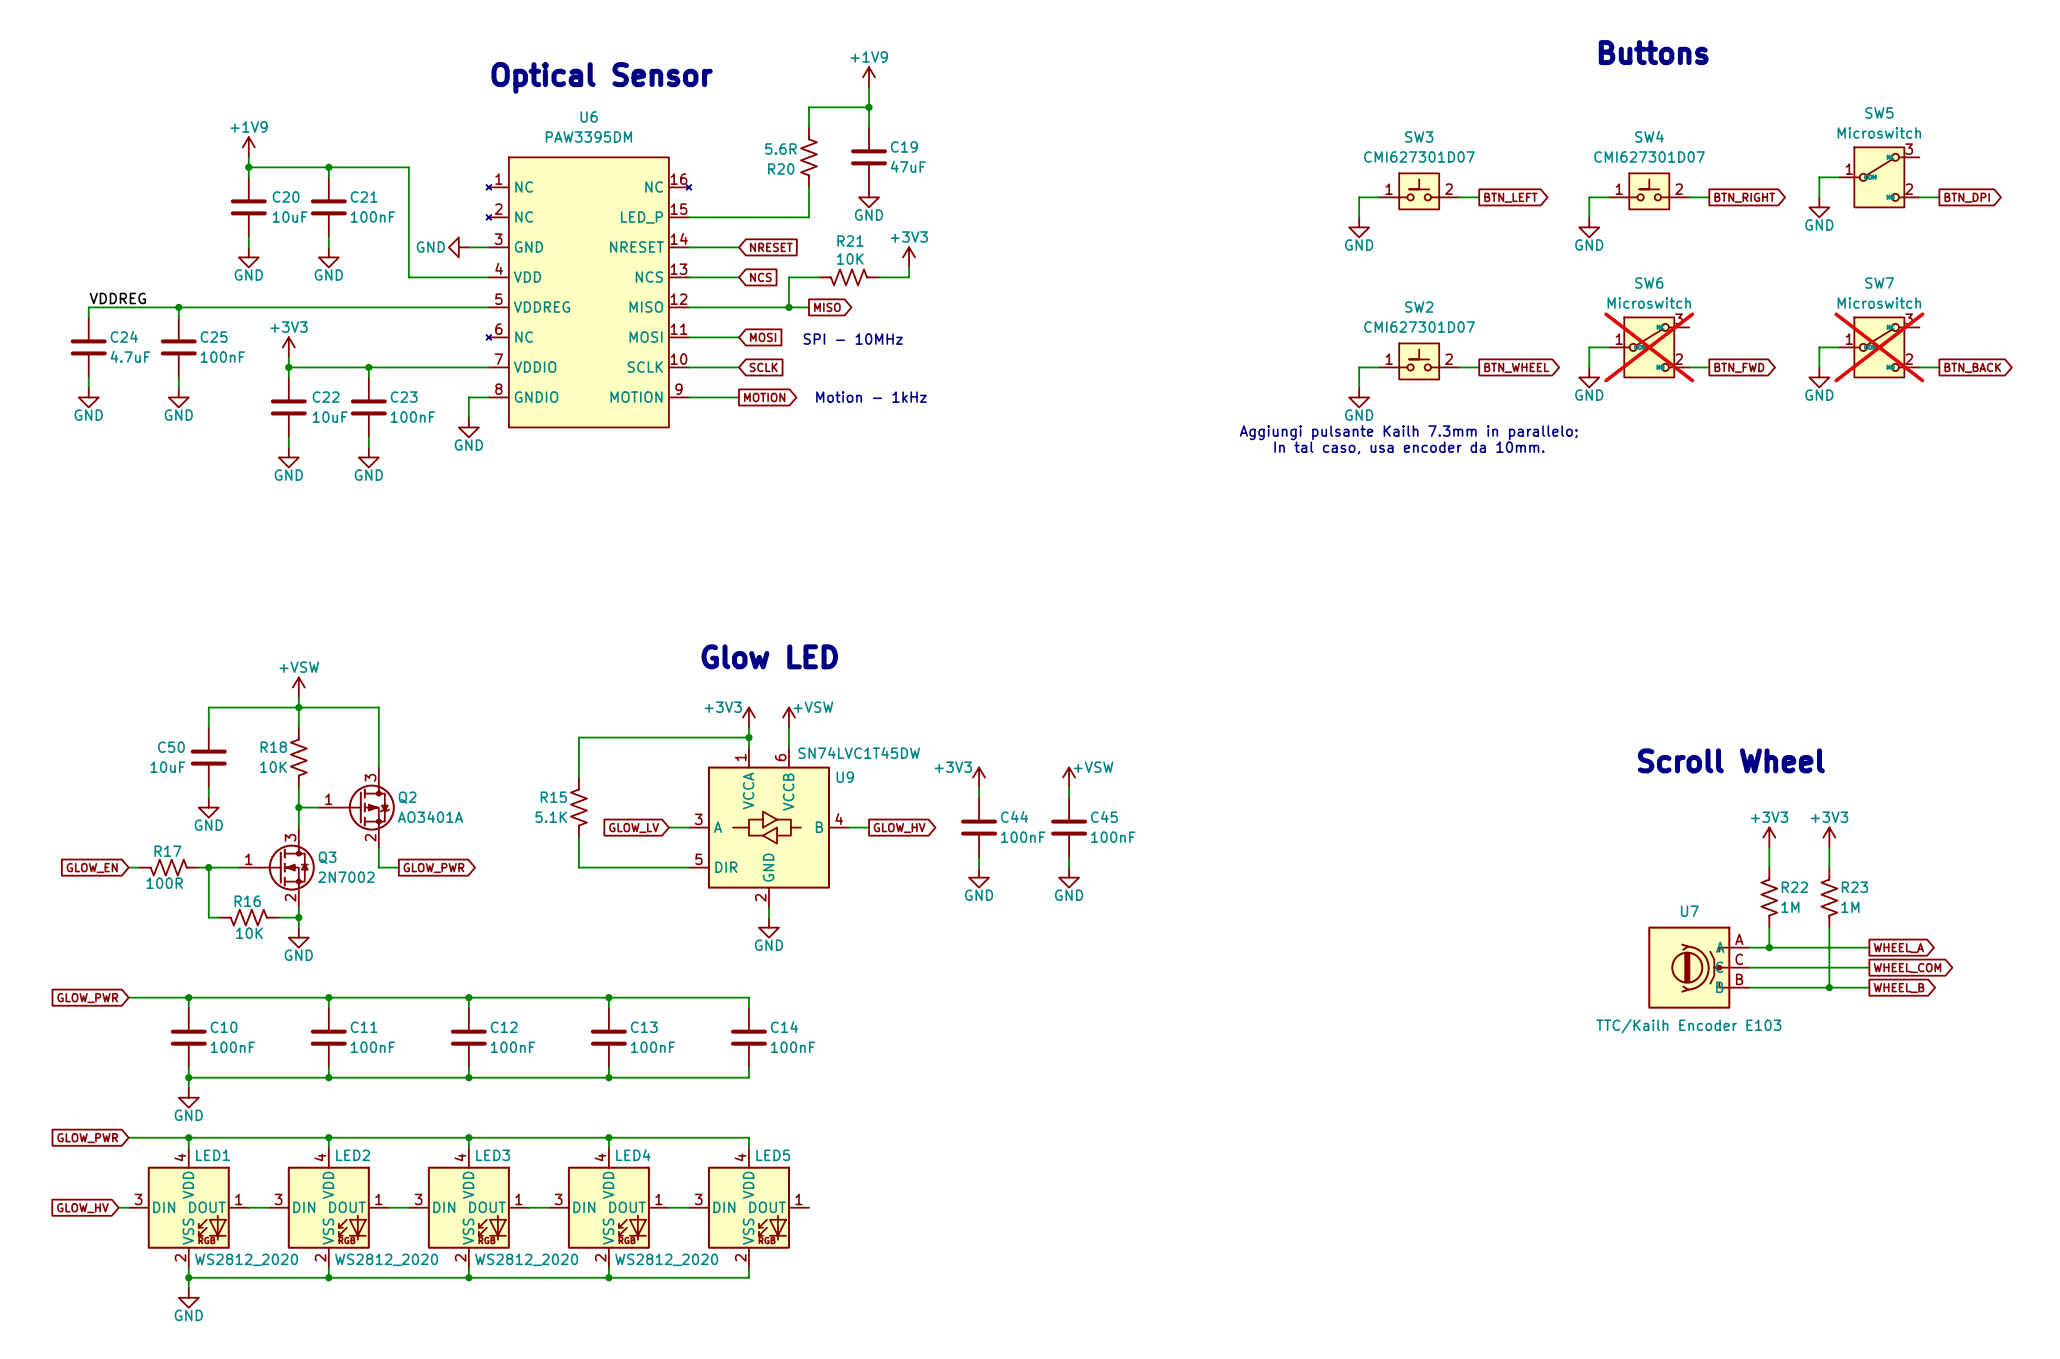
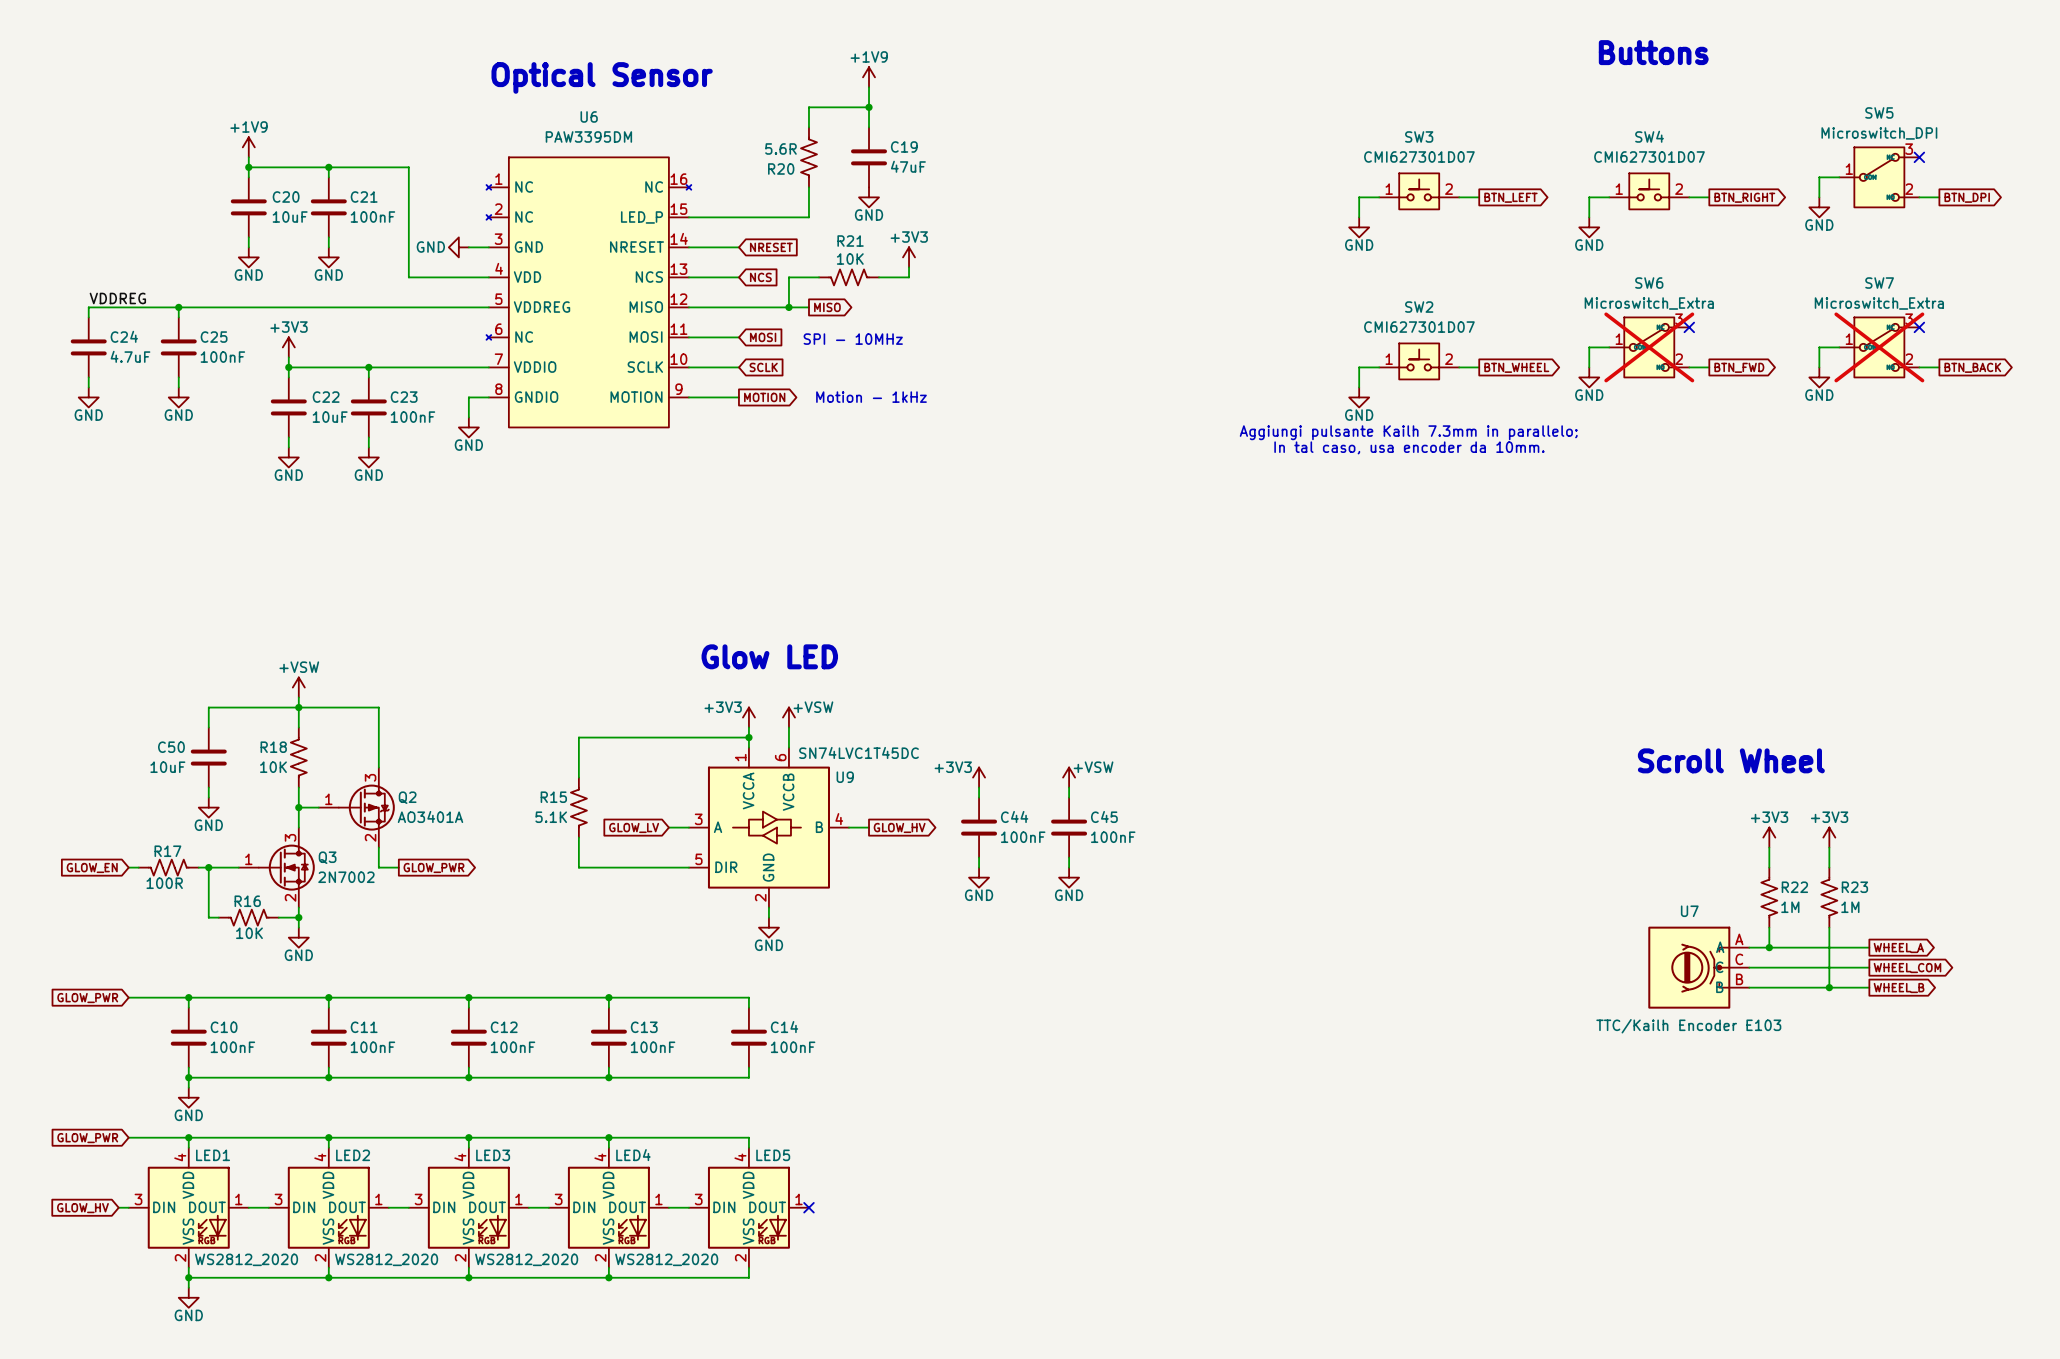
SW5 value: Microswitch (1879, 132) -> Microswitch_DPI (1879, 133)
no-connect mark: none -> (1919, 157)
SW6 value: Microswitch (1649, 303) -> Microswitch_Extra (1649, 303)
SW7 value: Microswitch (1879, 303) -> Microswitch_Extra (1879, 303)
no-connect mark: none -> (1689, 327)
no-connect mark: none -> (1919, 327)
U9 value: SN74LVC1T45DW (859, 752) -> SN74LVC1T45DC (859, 752)
no-connect mark: none -> (808, 1207)

